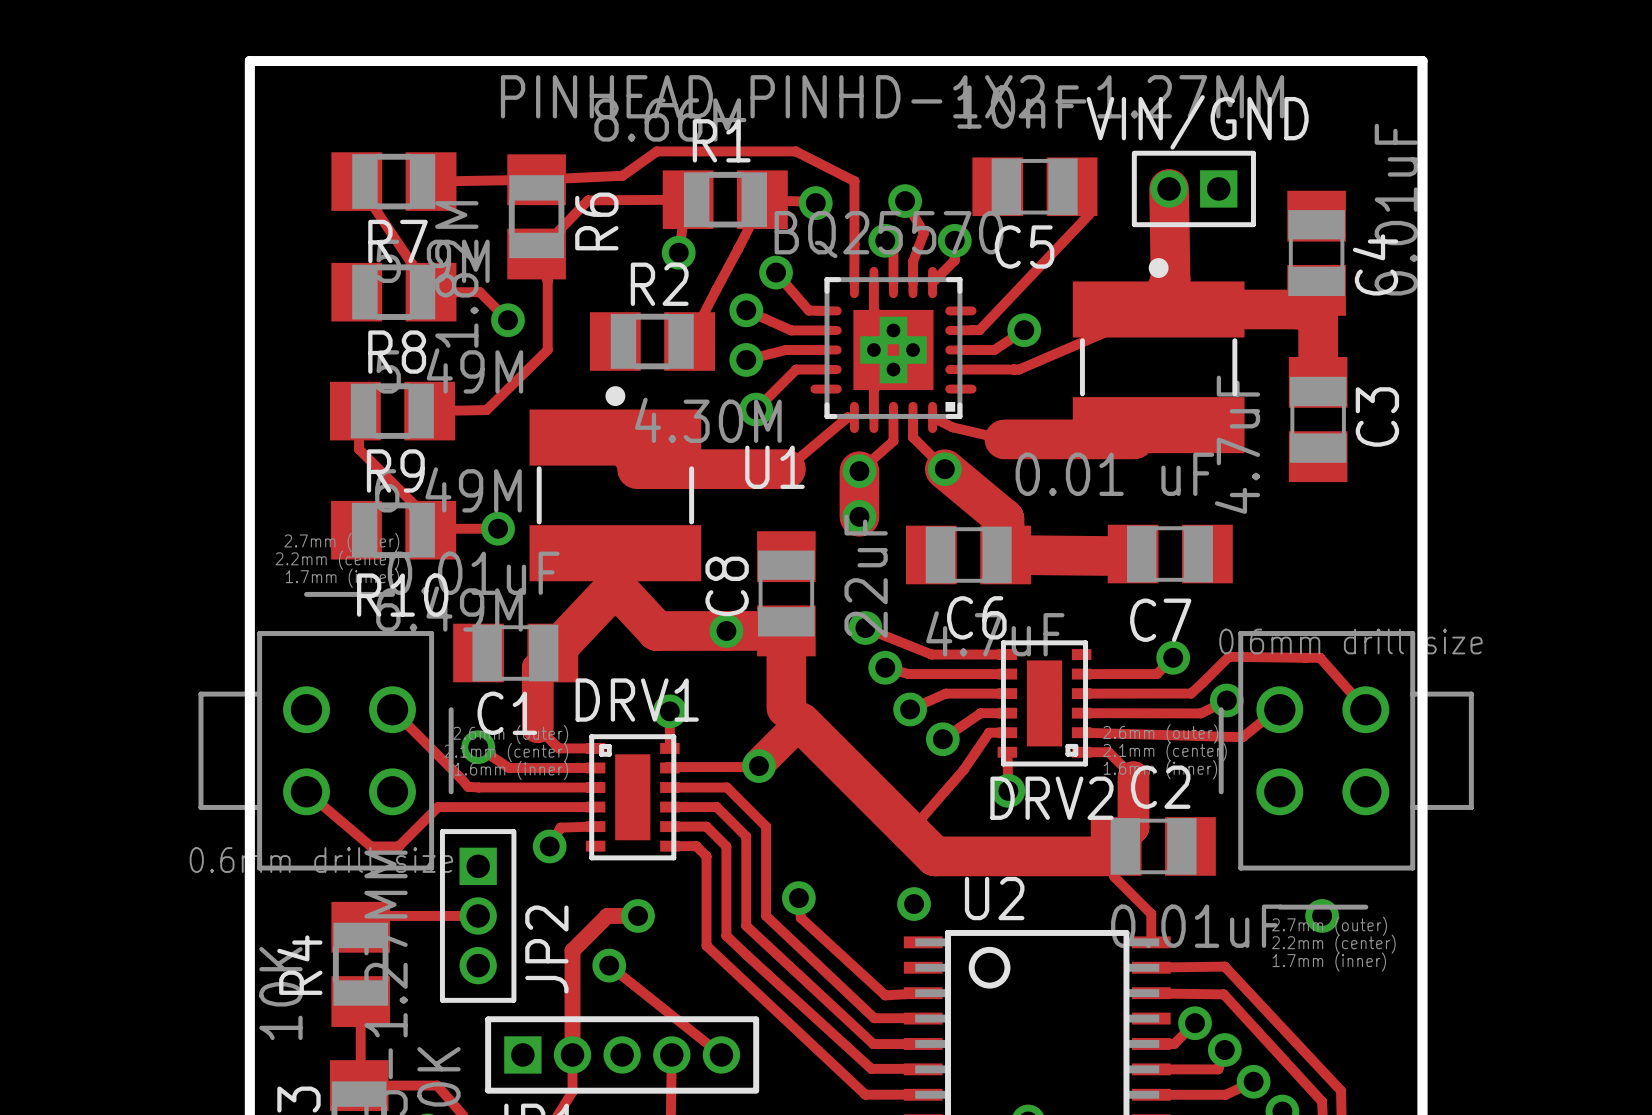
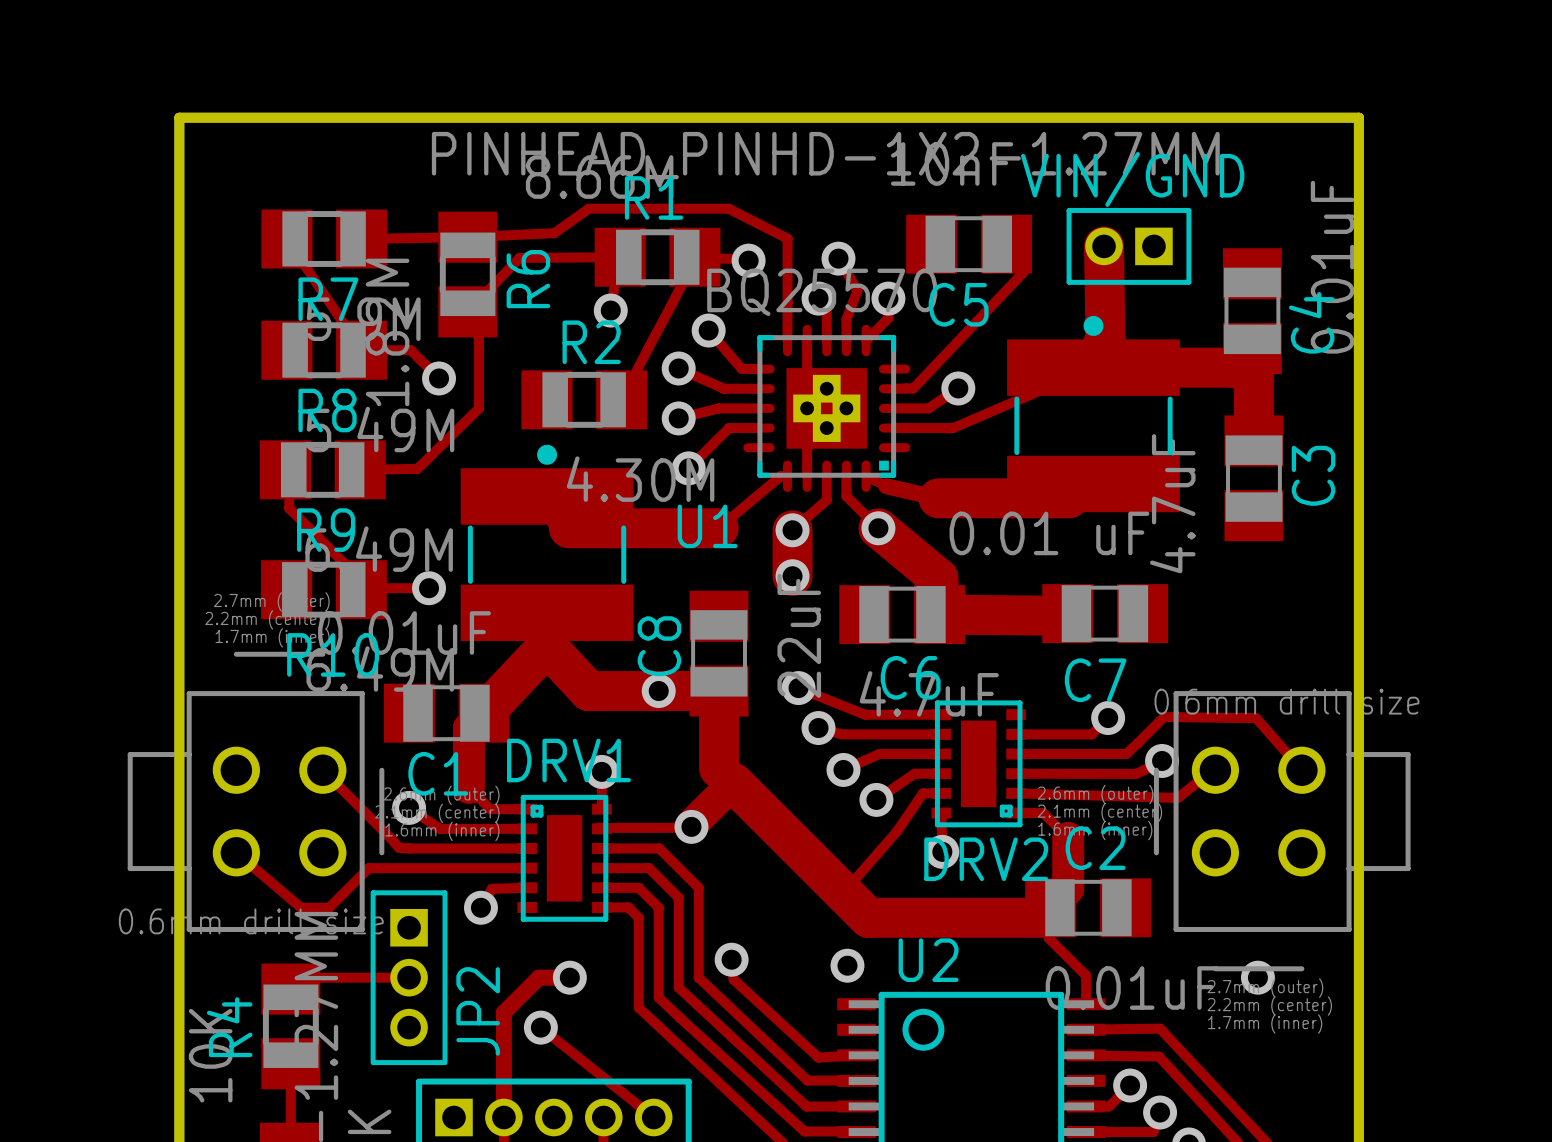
track width: thin (952, 427) (1004, 439) -> thick (886, 486) (938, 498)

